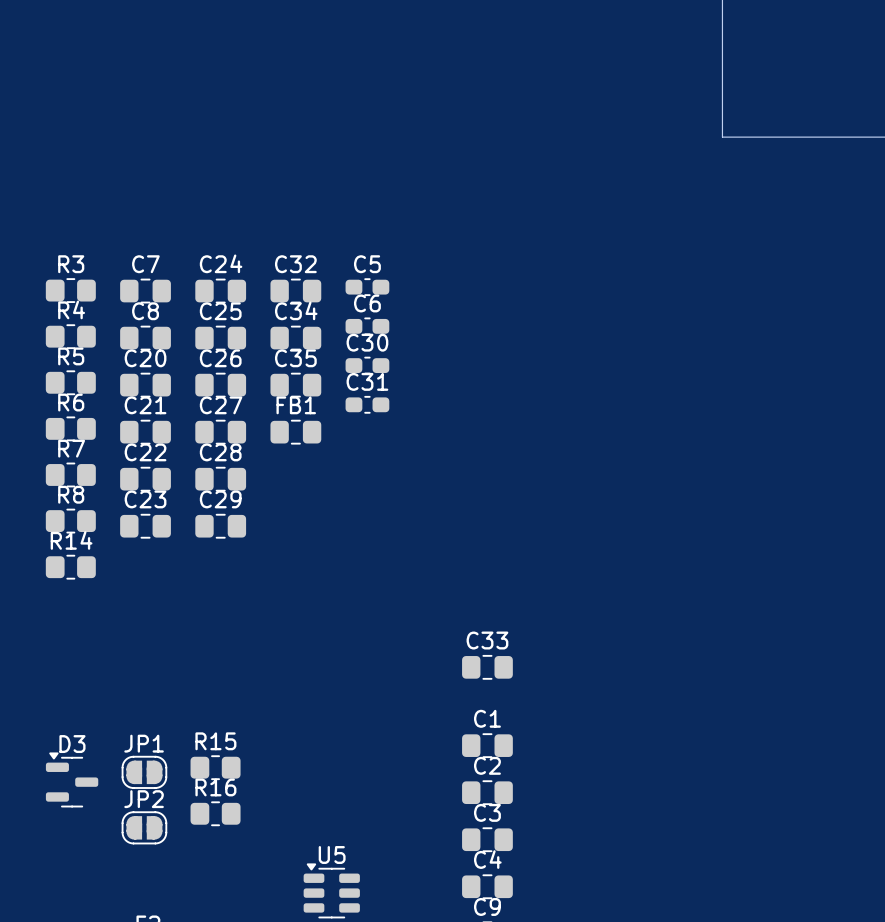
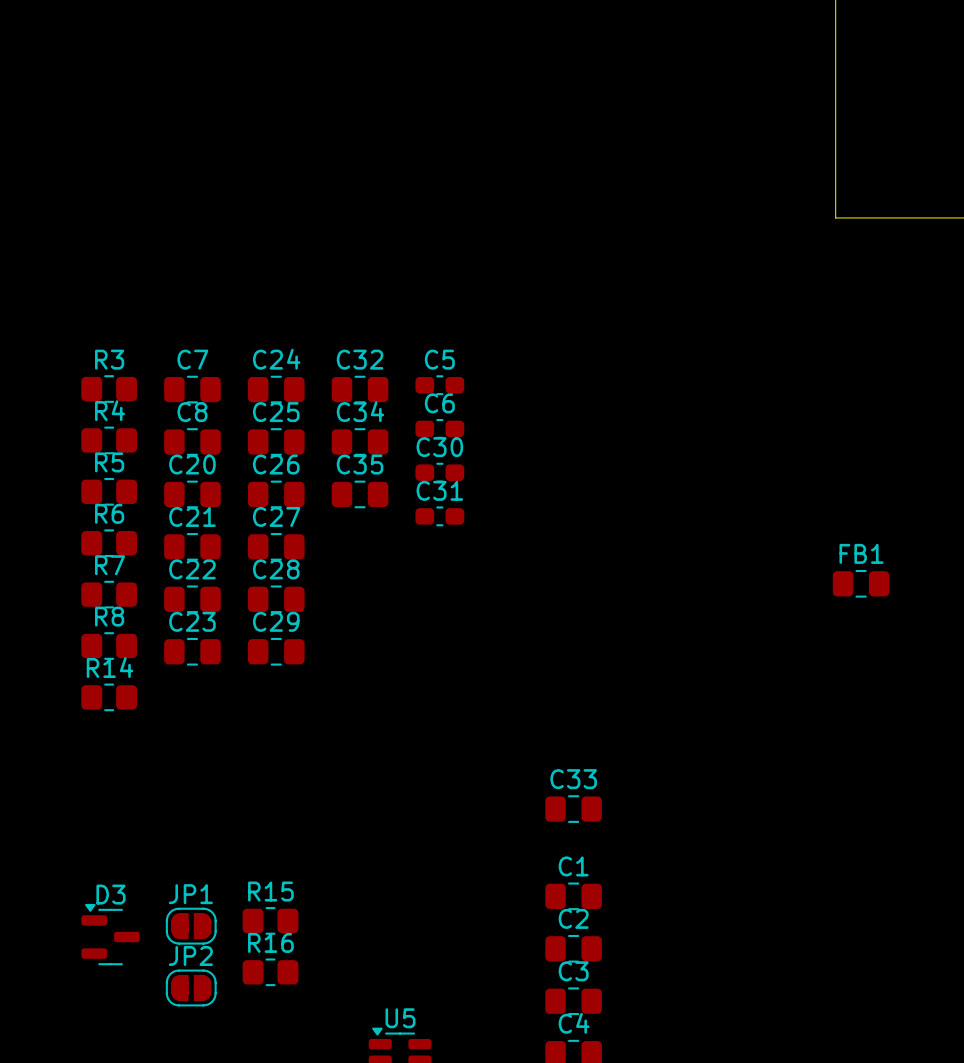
FB1 position: (295, 432) -> (861, 583)

